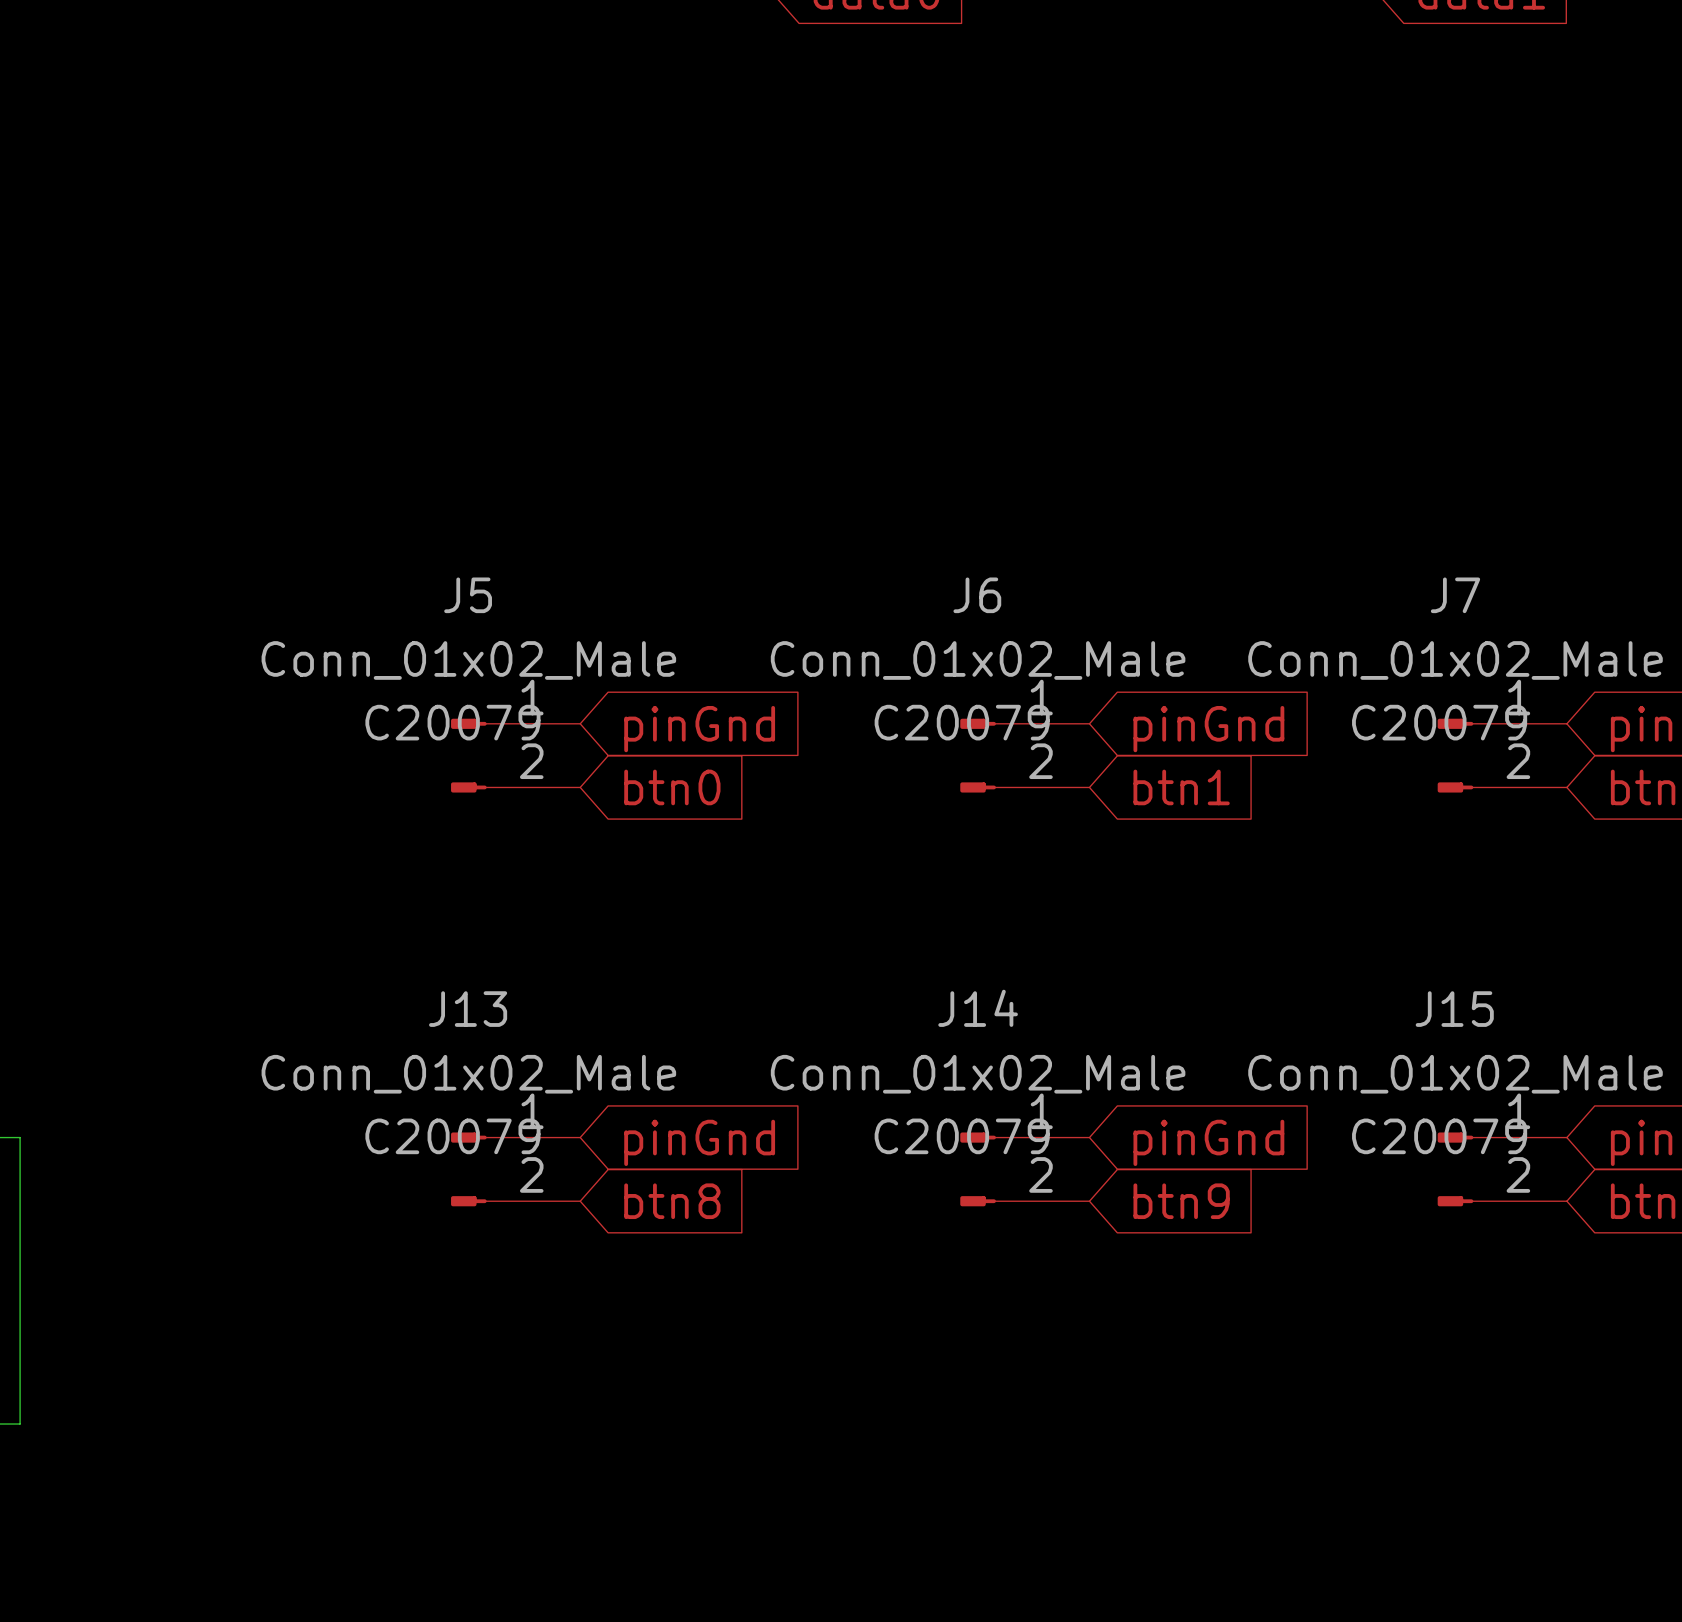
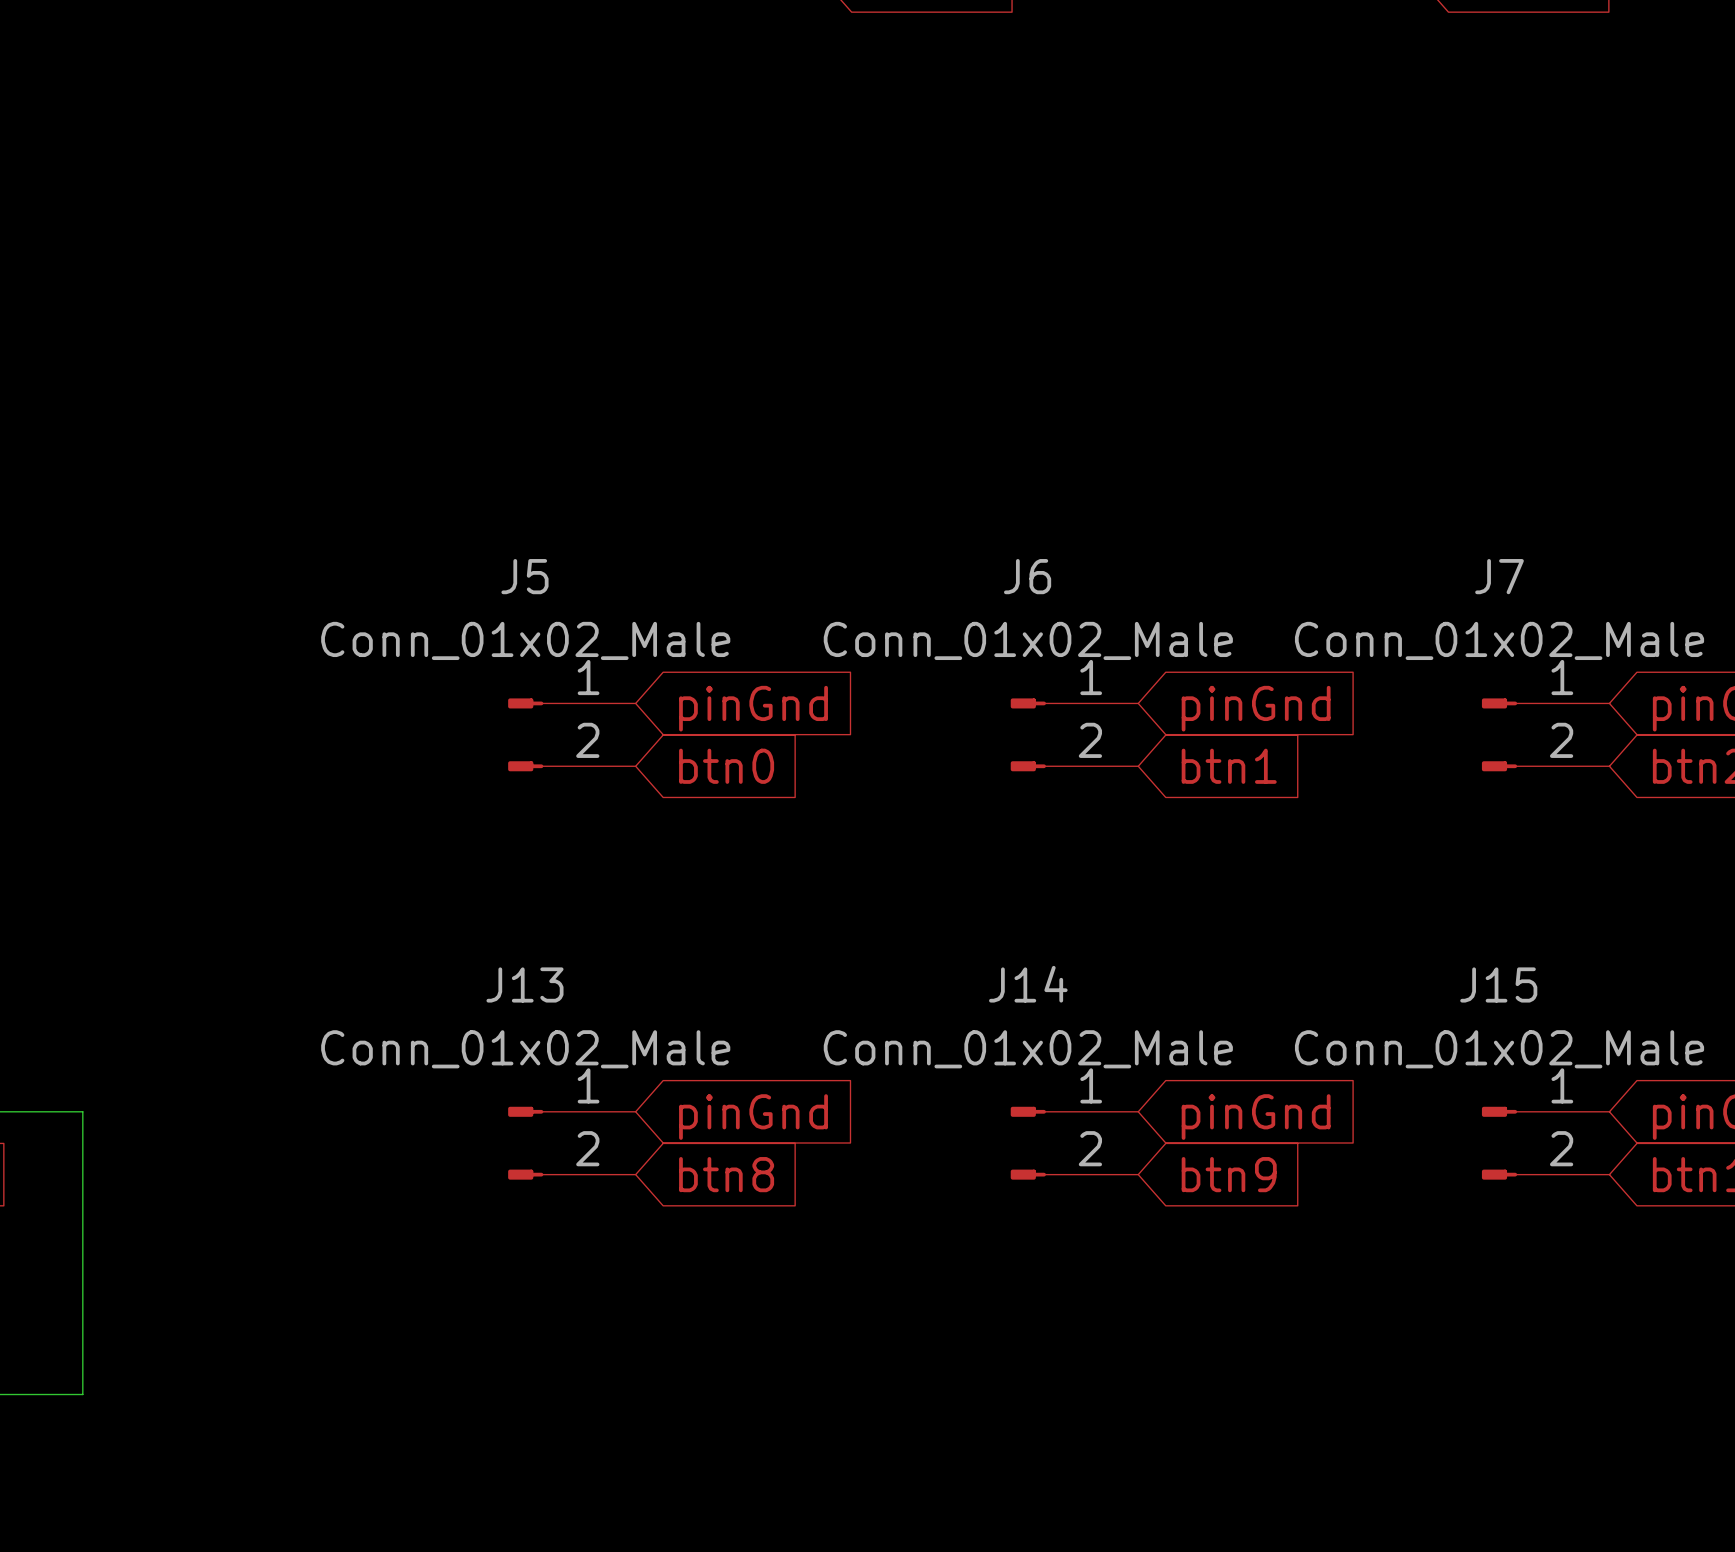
J5 text: C20079 (452, 722) -> none
J6 text: C20079 (962, 722) -> none
J7 text: C20079 (1439, 722) -> none
J13 text: C20079 (452, 1136) -> none
J14 text: C20079 (962, 1136) -> none
J15 text: C20079 (1439, 1136) -> none

